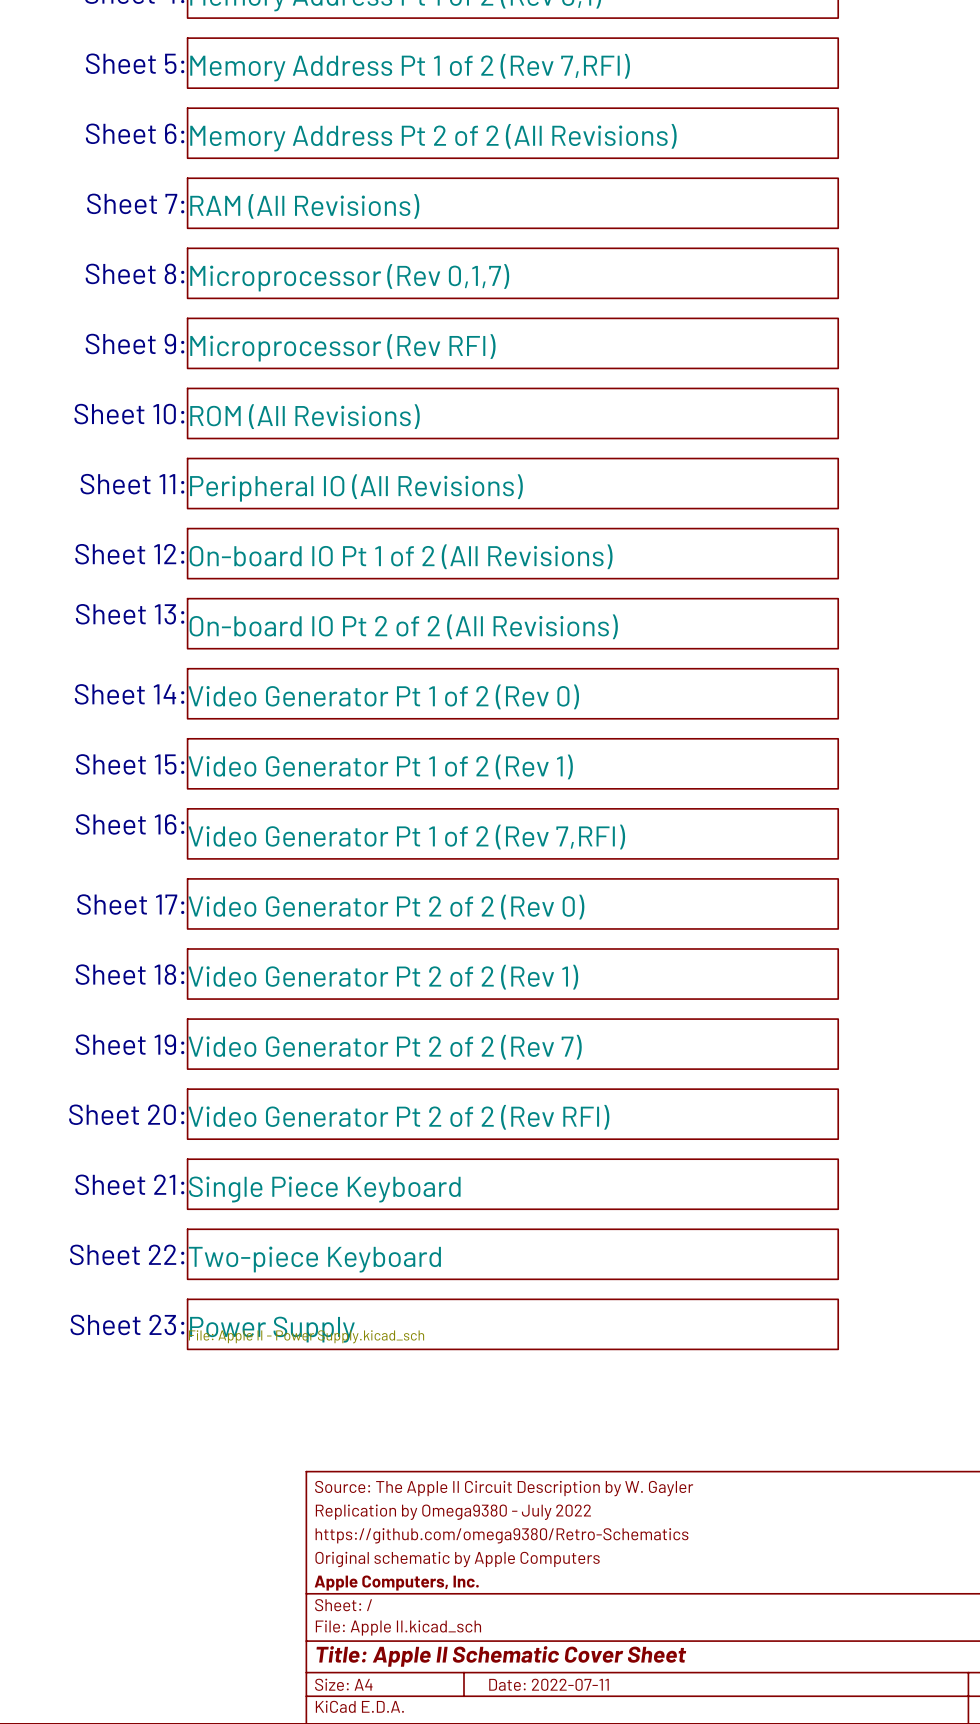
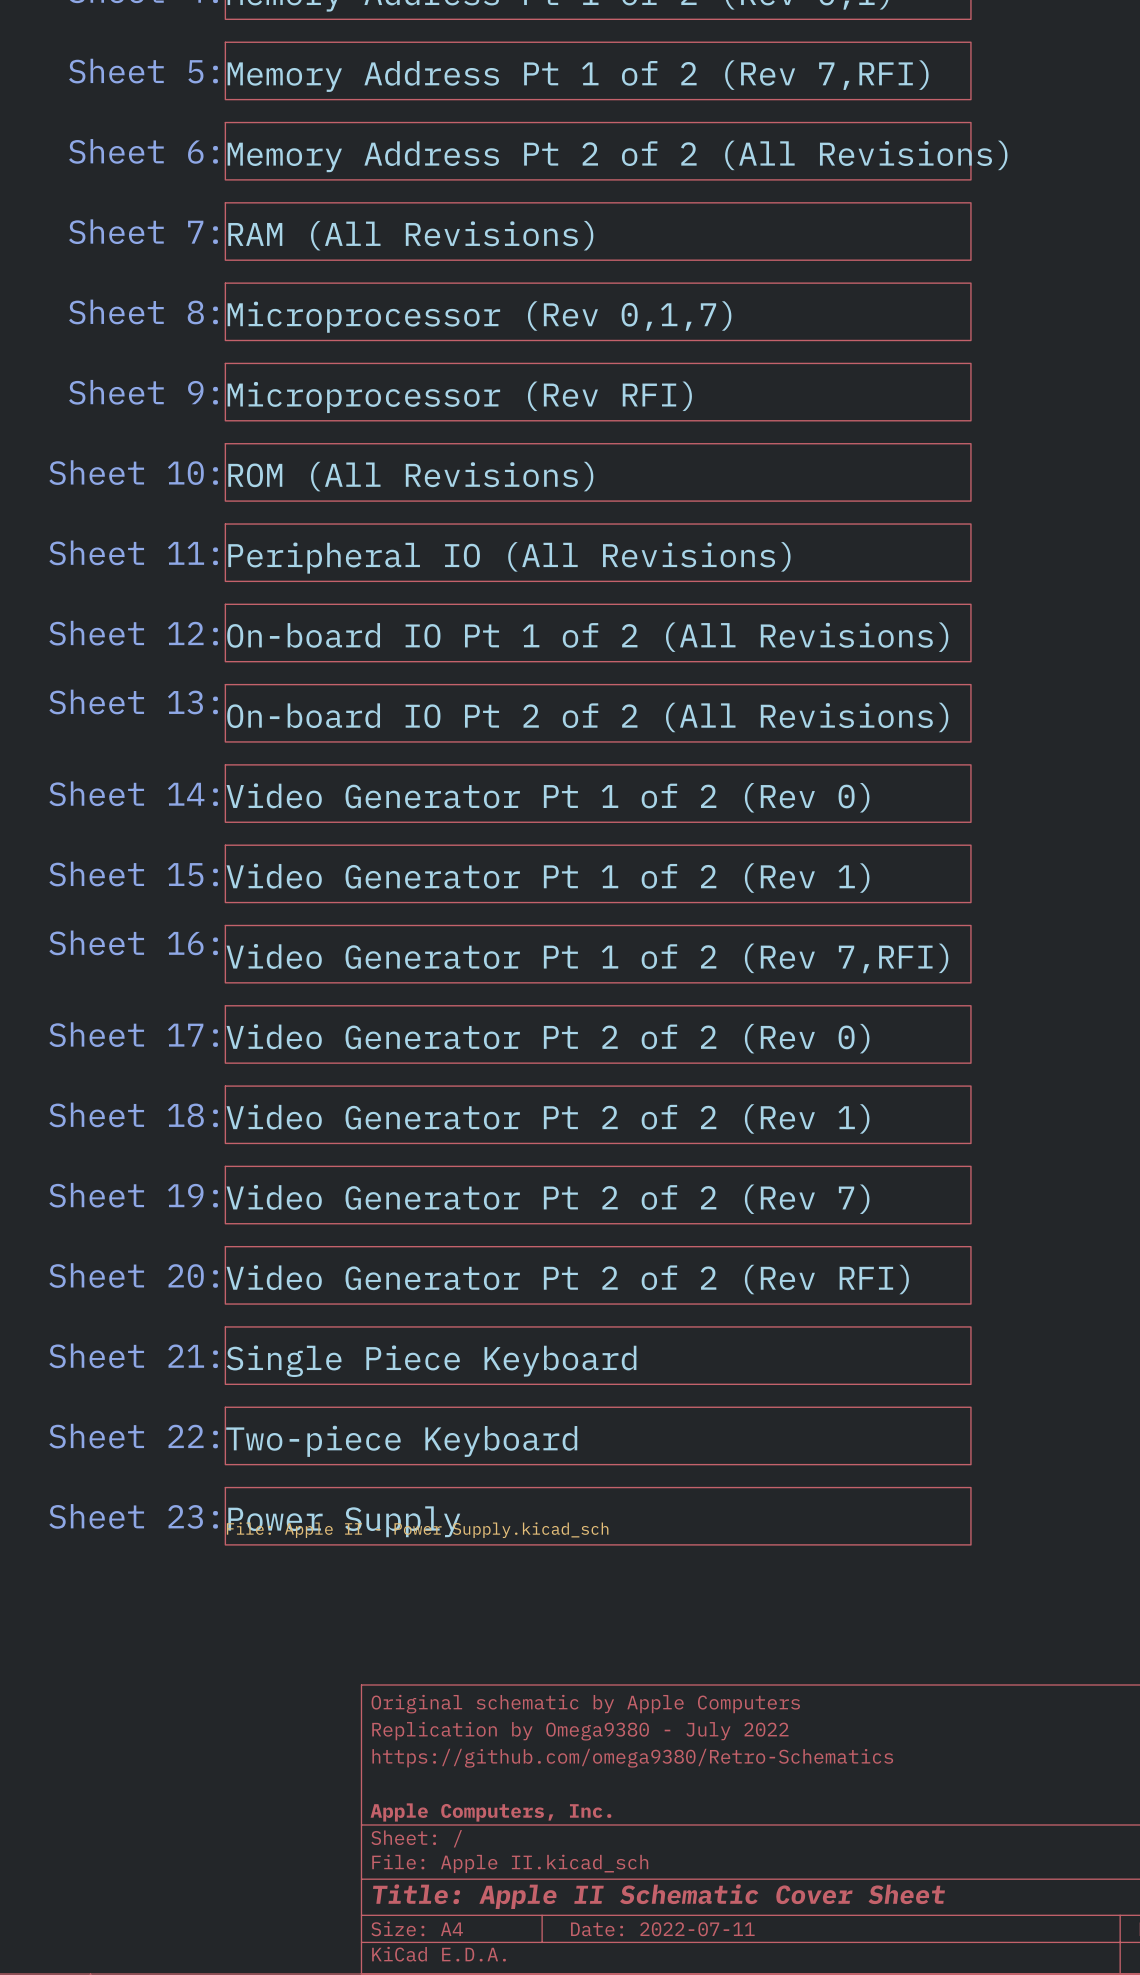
title block: Source: The Apple II Circuit Description by W. Gayler (504, 1488) -> Original schematic by Apple Computers (585, 1704)
title block: Original schematic by Apple Computers (457, 1559) -> none

